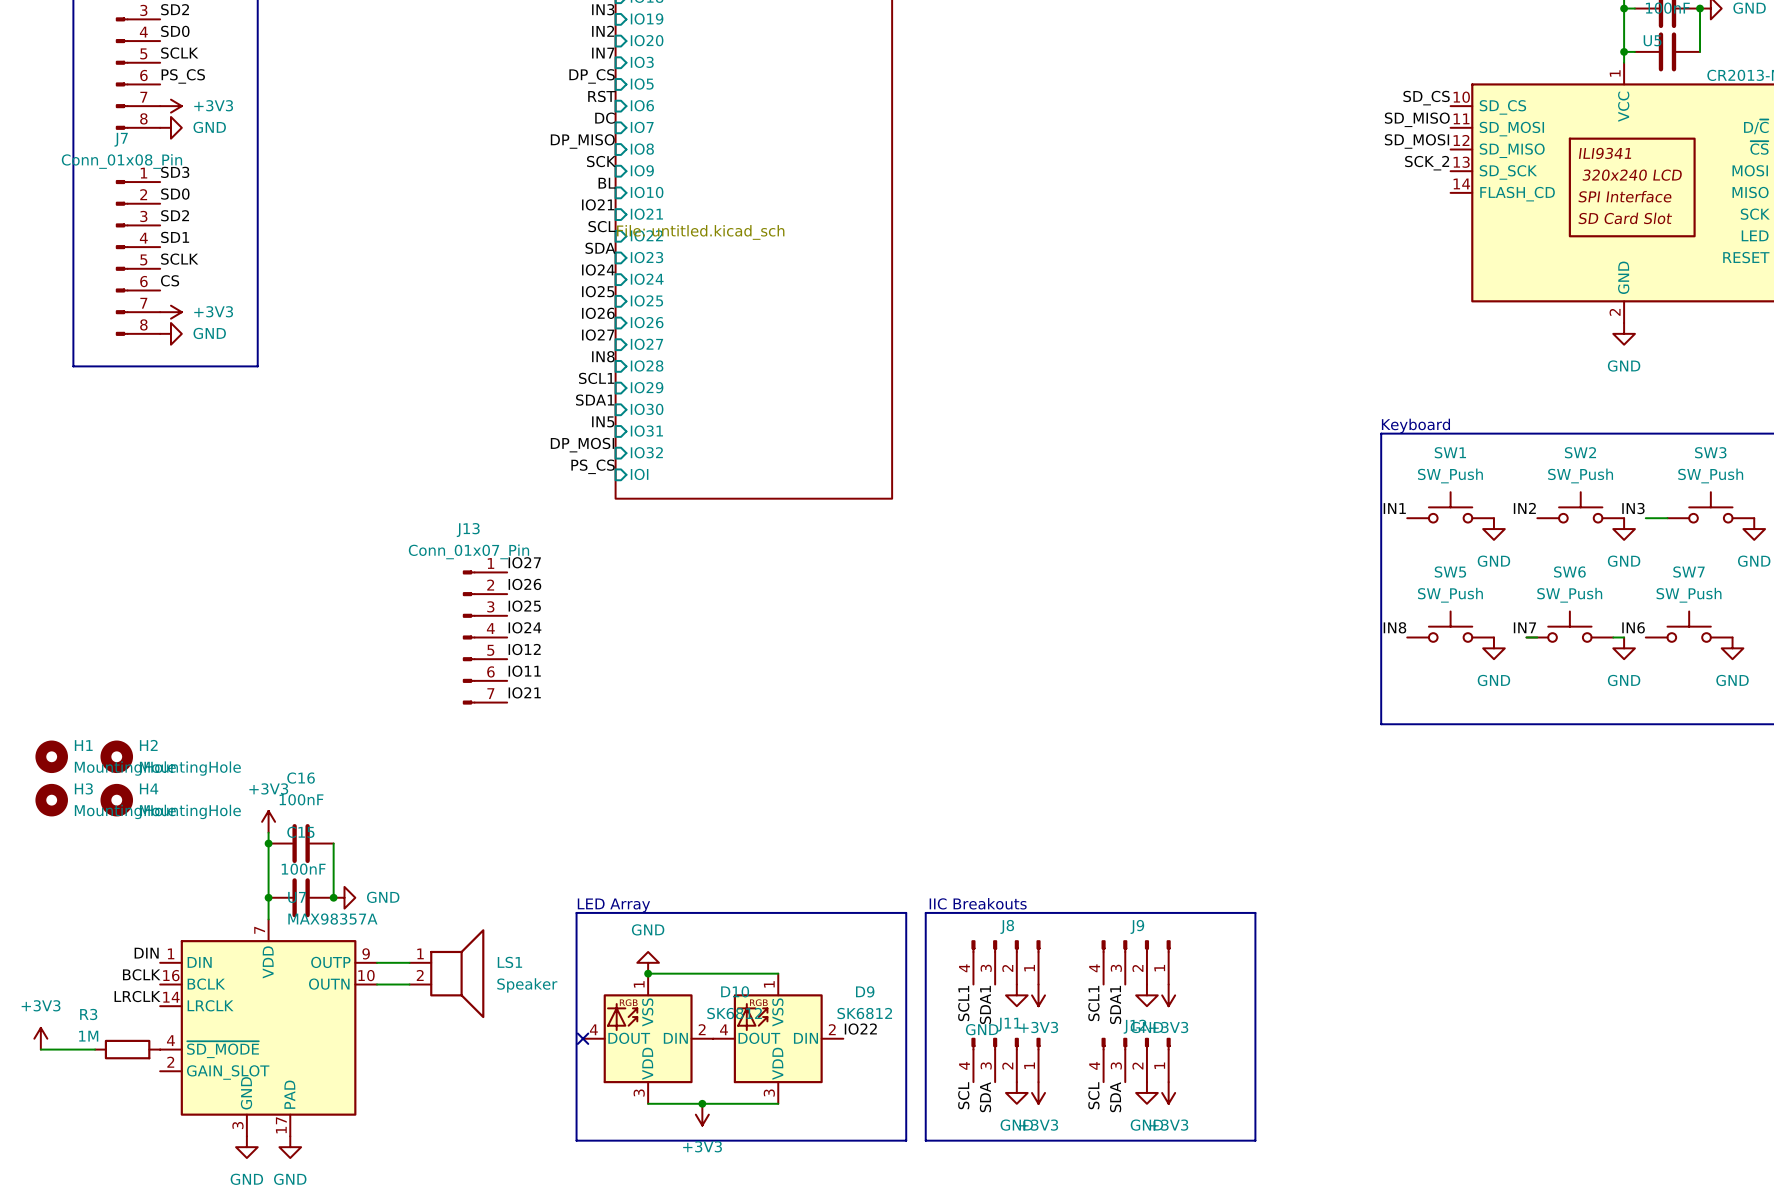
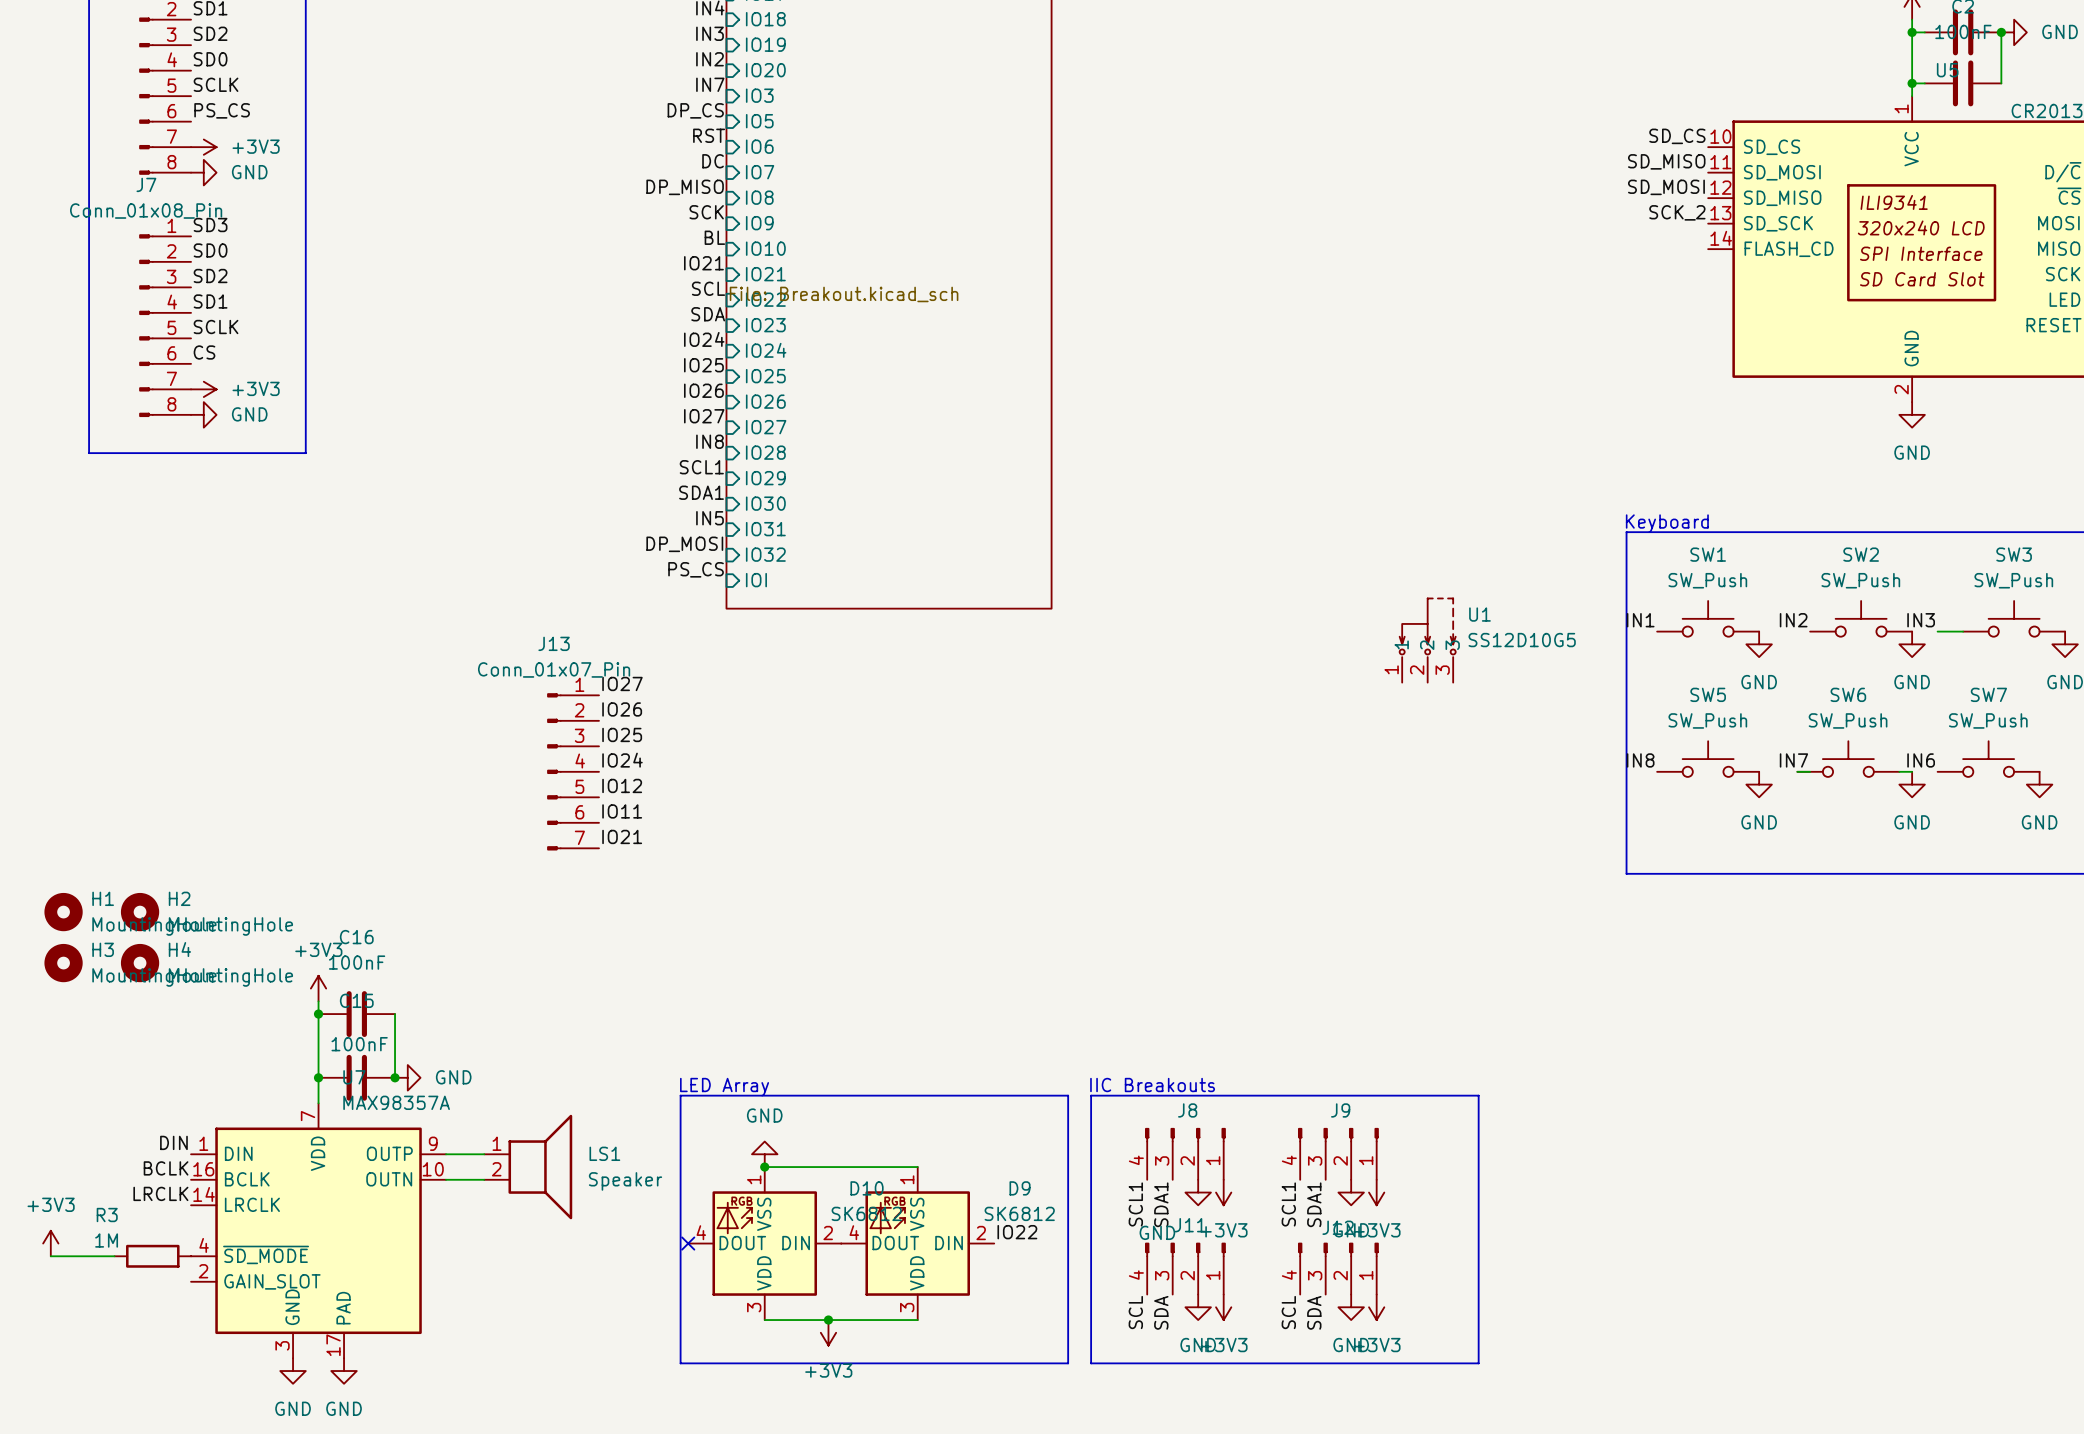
sheet value: File: untitled.kicad_sch (700, 232) -> File: Breakout.kicad_sch (844, 294)
U1: none -> SS12D10G5 (1427, 640)

